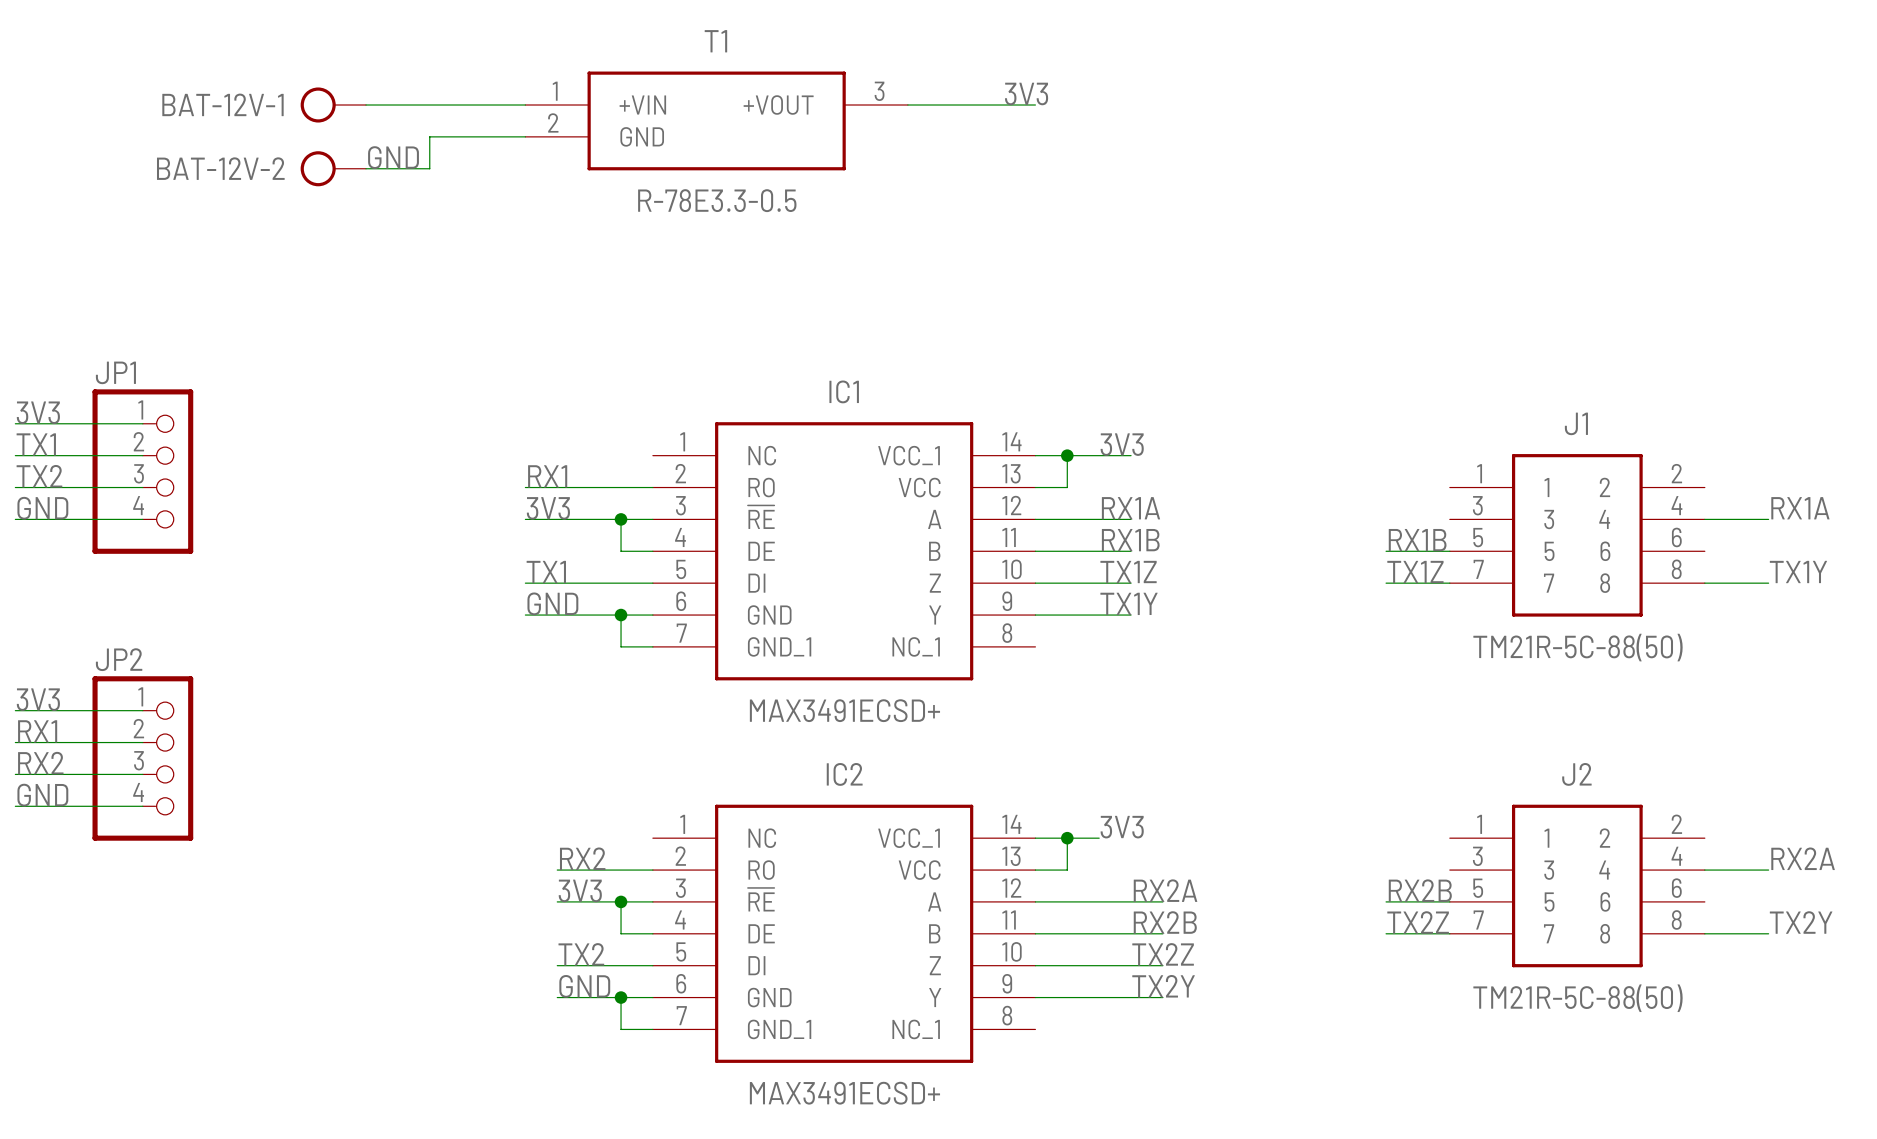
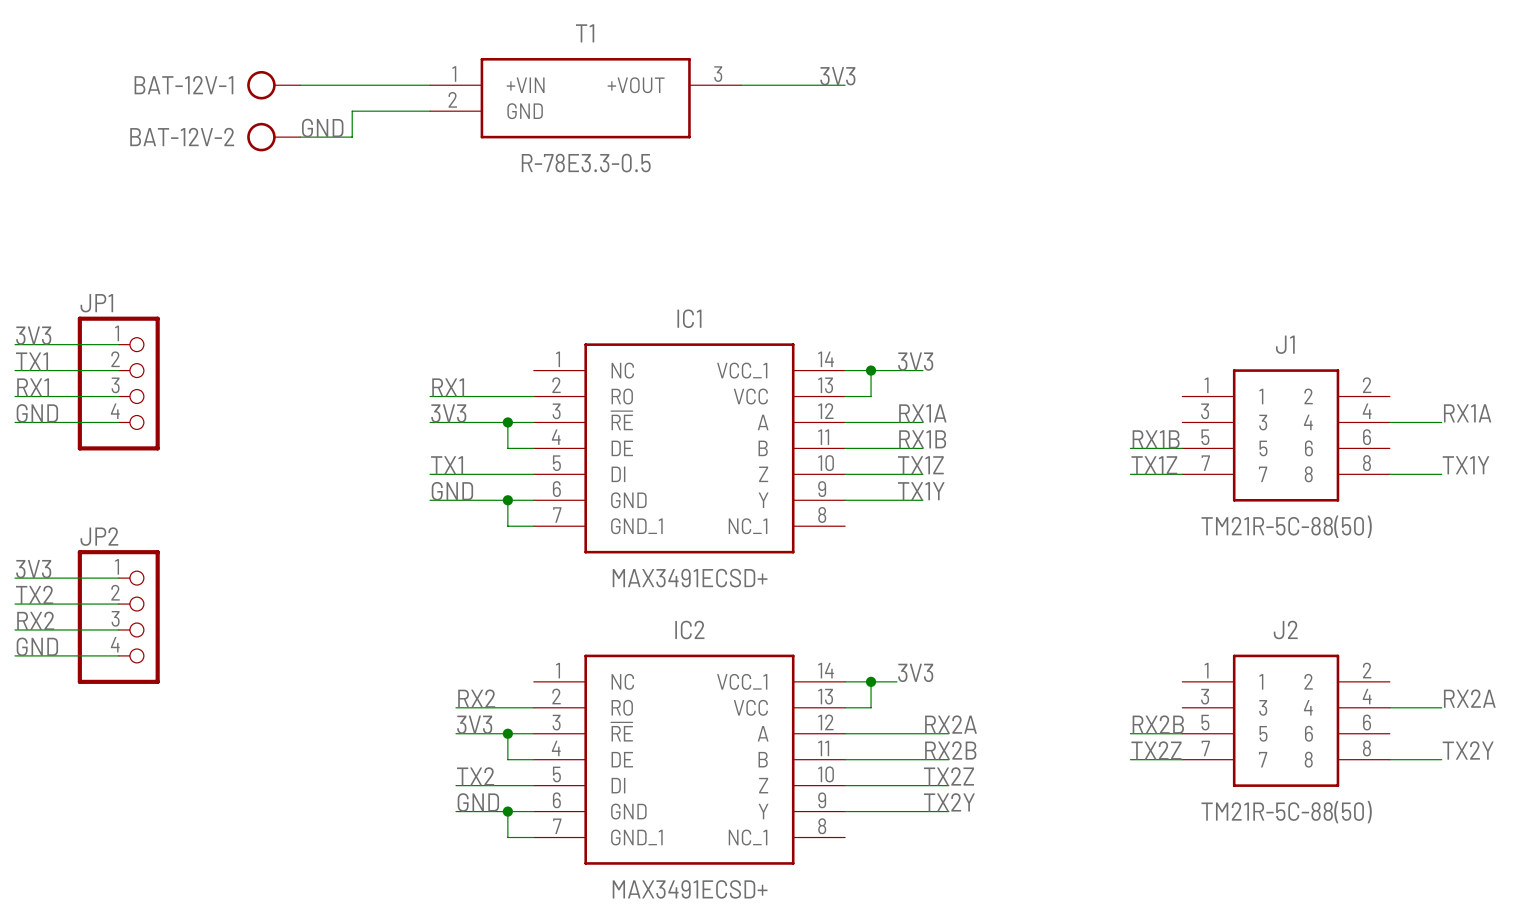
label: TX2 (39, 476) -> RX1 (33, 387)
label: RX1 (37, 731) -> TX2 (34, 594)

